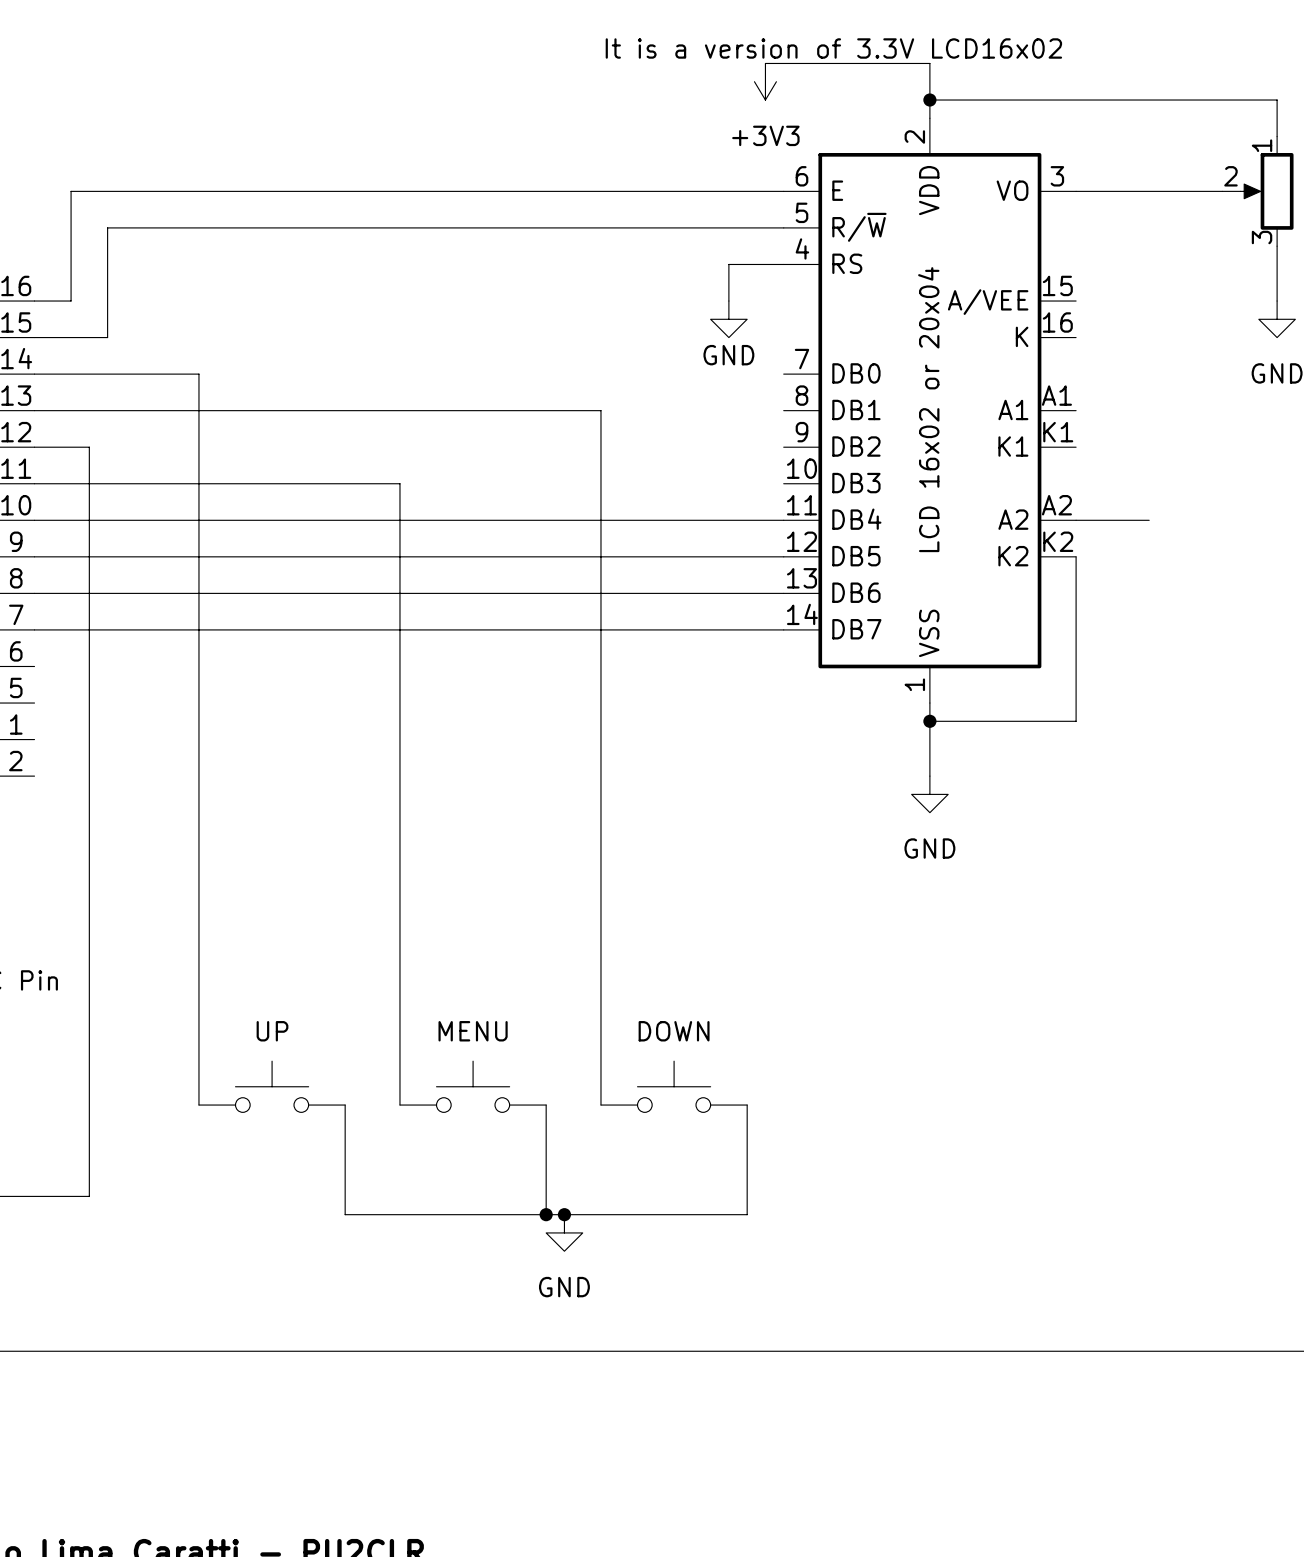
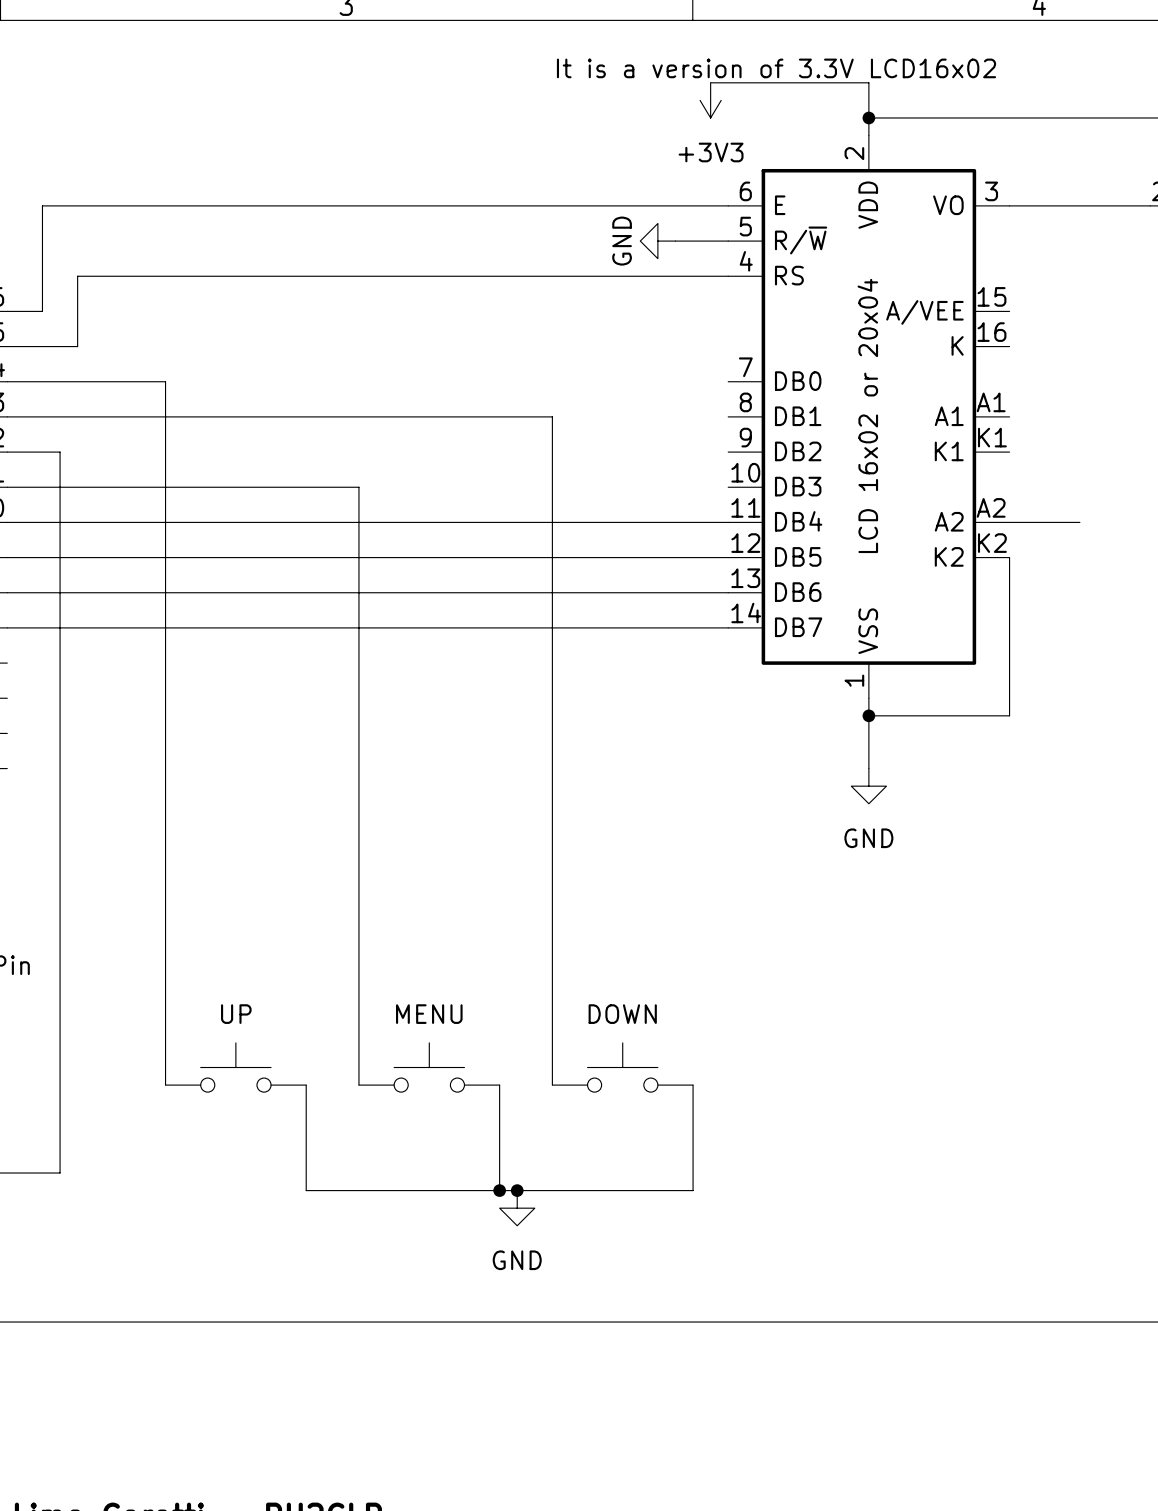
wire: (728, 227) (107, 227) (107, 264) -> (675, 276) (77, 276)
wire: (728, 264) (728, 301) -> none
power symbol rotation: 0° (728, 319) -> 90° clockwise (657, 241)
power symbol position: GND (728, 319) -> GND (657, 241)

